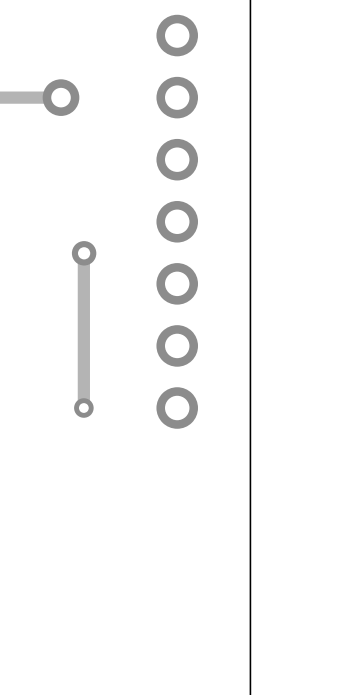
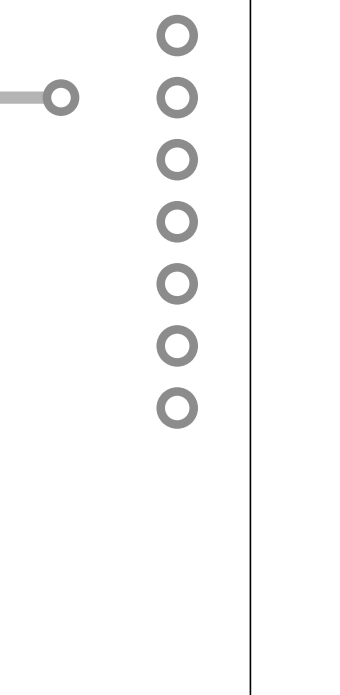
track: (83, 253) (83, 408) -> none
via: (84, 253) -> none
via: (83, 408) -> none

